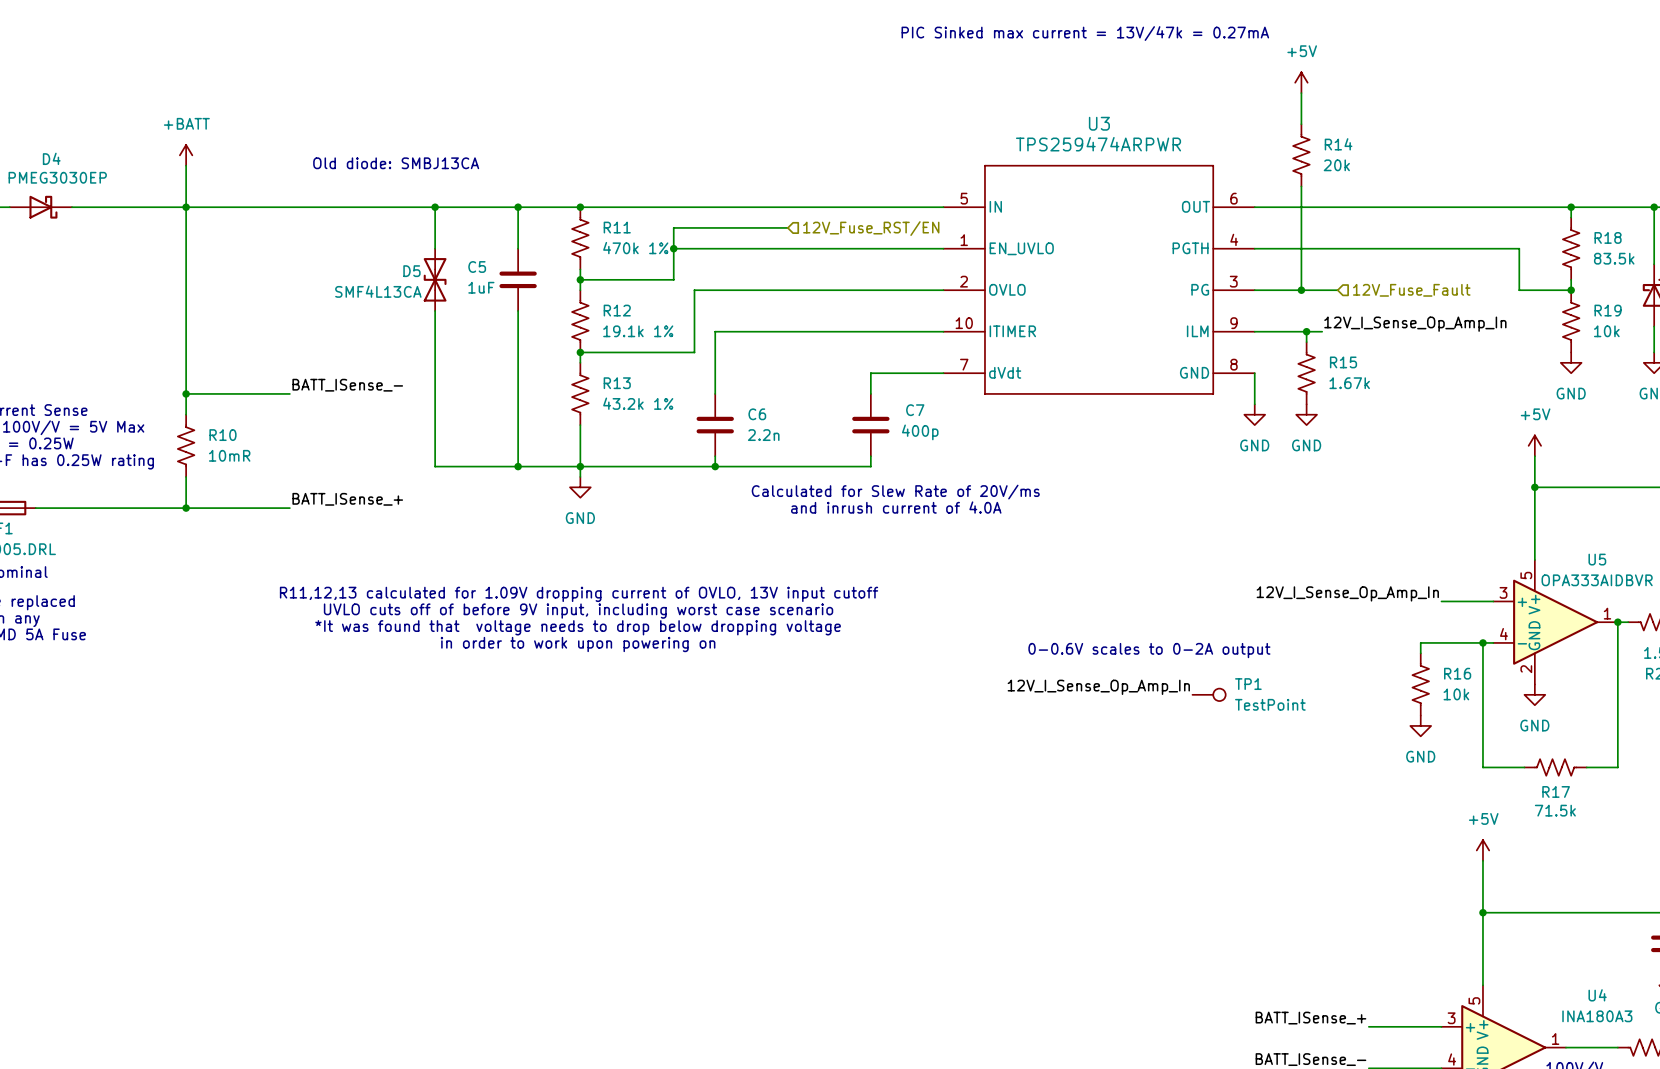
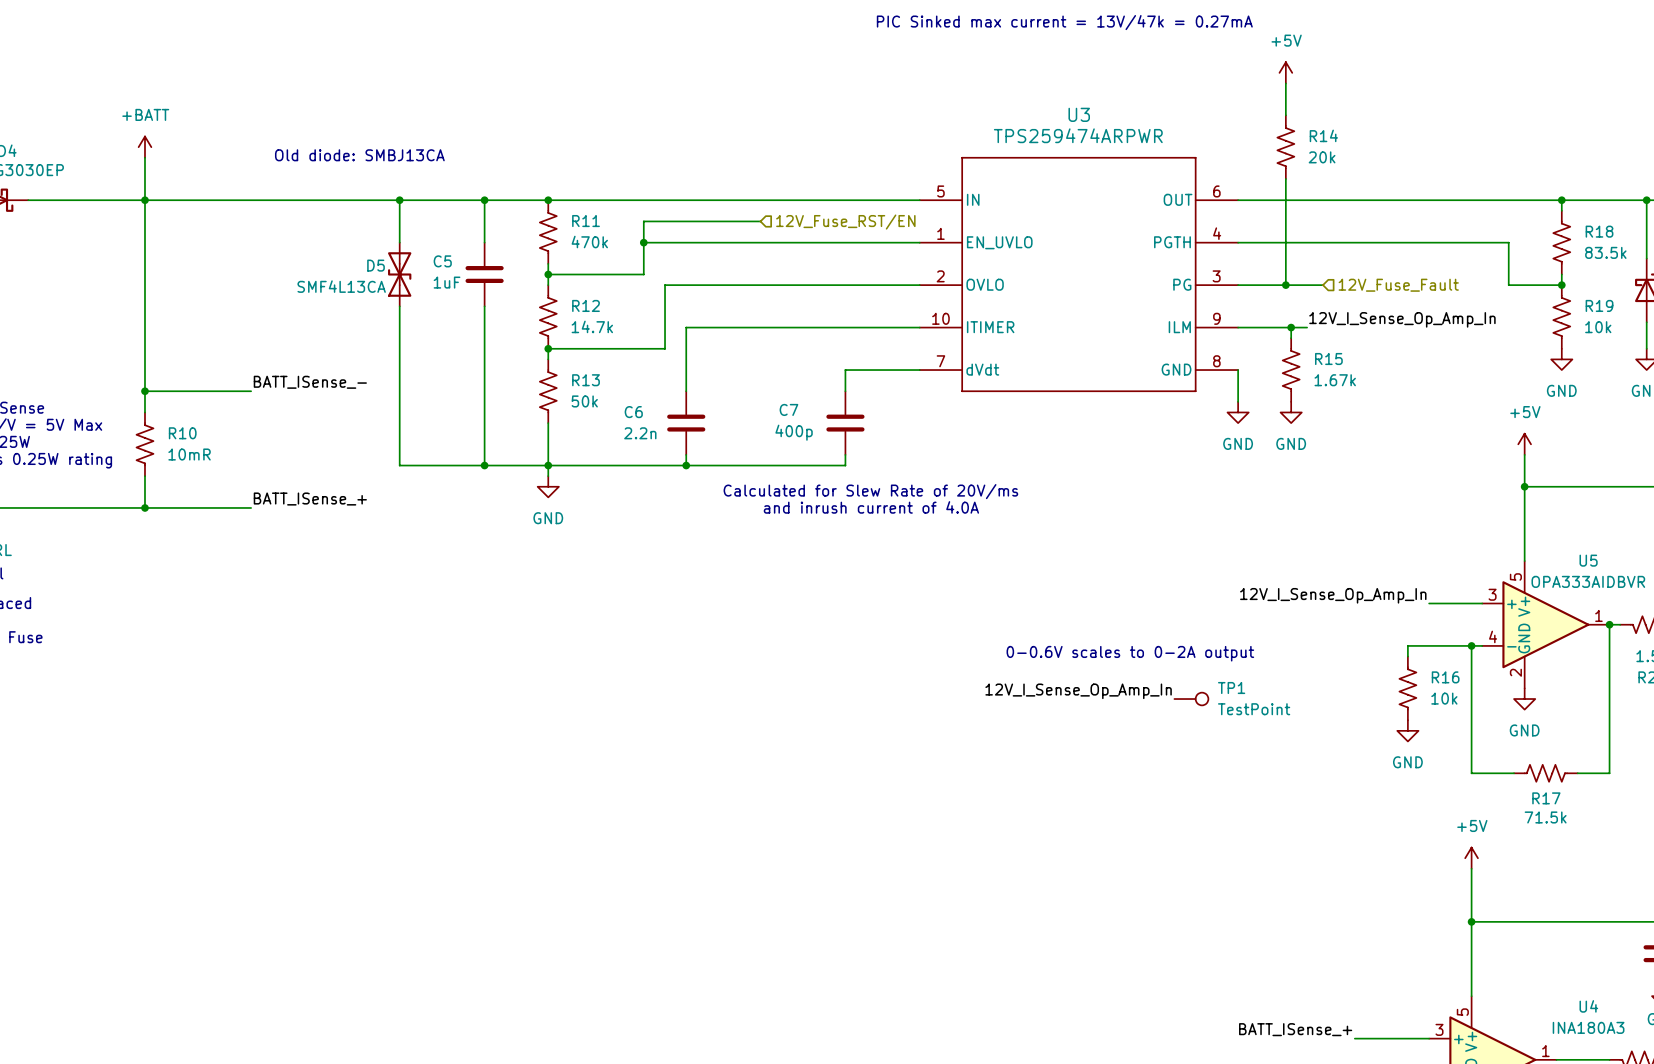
R11 value: 470k 1% (635, 248) -> 470k (589, 242)
R12 value: 19.1k 1% (638, 331) -> 14.7k (592, 326)
R13 value: 43.2k 1% (638, 403) -> 50k (584, 401)
C7 name position: C7 (915, 410) -> C7 (788, 409)
C6 name position: C6 (757, 414) -> C6 (633, 412)
C7 value position: 400p (920, 432) -> 400p (794, 432)
C6 value position: 2.2n (763, 435) -> 2.2n (640, 433)
text: R11,12,13 calculated for 1.09V dropping current of OVLO, 13V input cutoff (579, 594) -> none
text: UVLO cuts off of before 9V input, including worst case scenario (578, 611) -> none
text: *It was found that voltage needs to drop below dropping voltage (578, 627) -> none
text: in order to work upon powering on (578, 644) -> none

